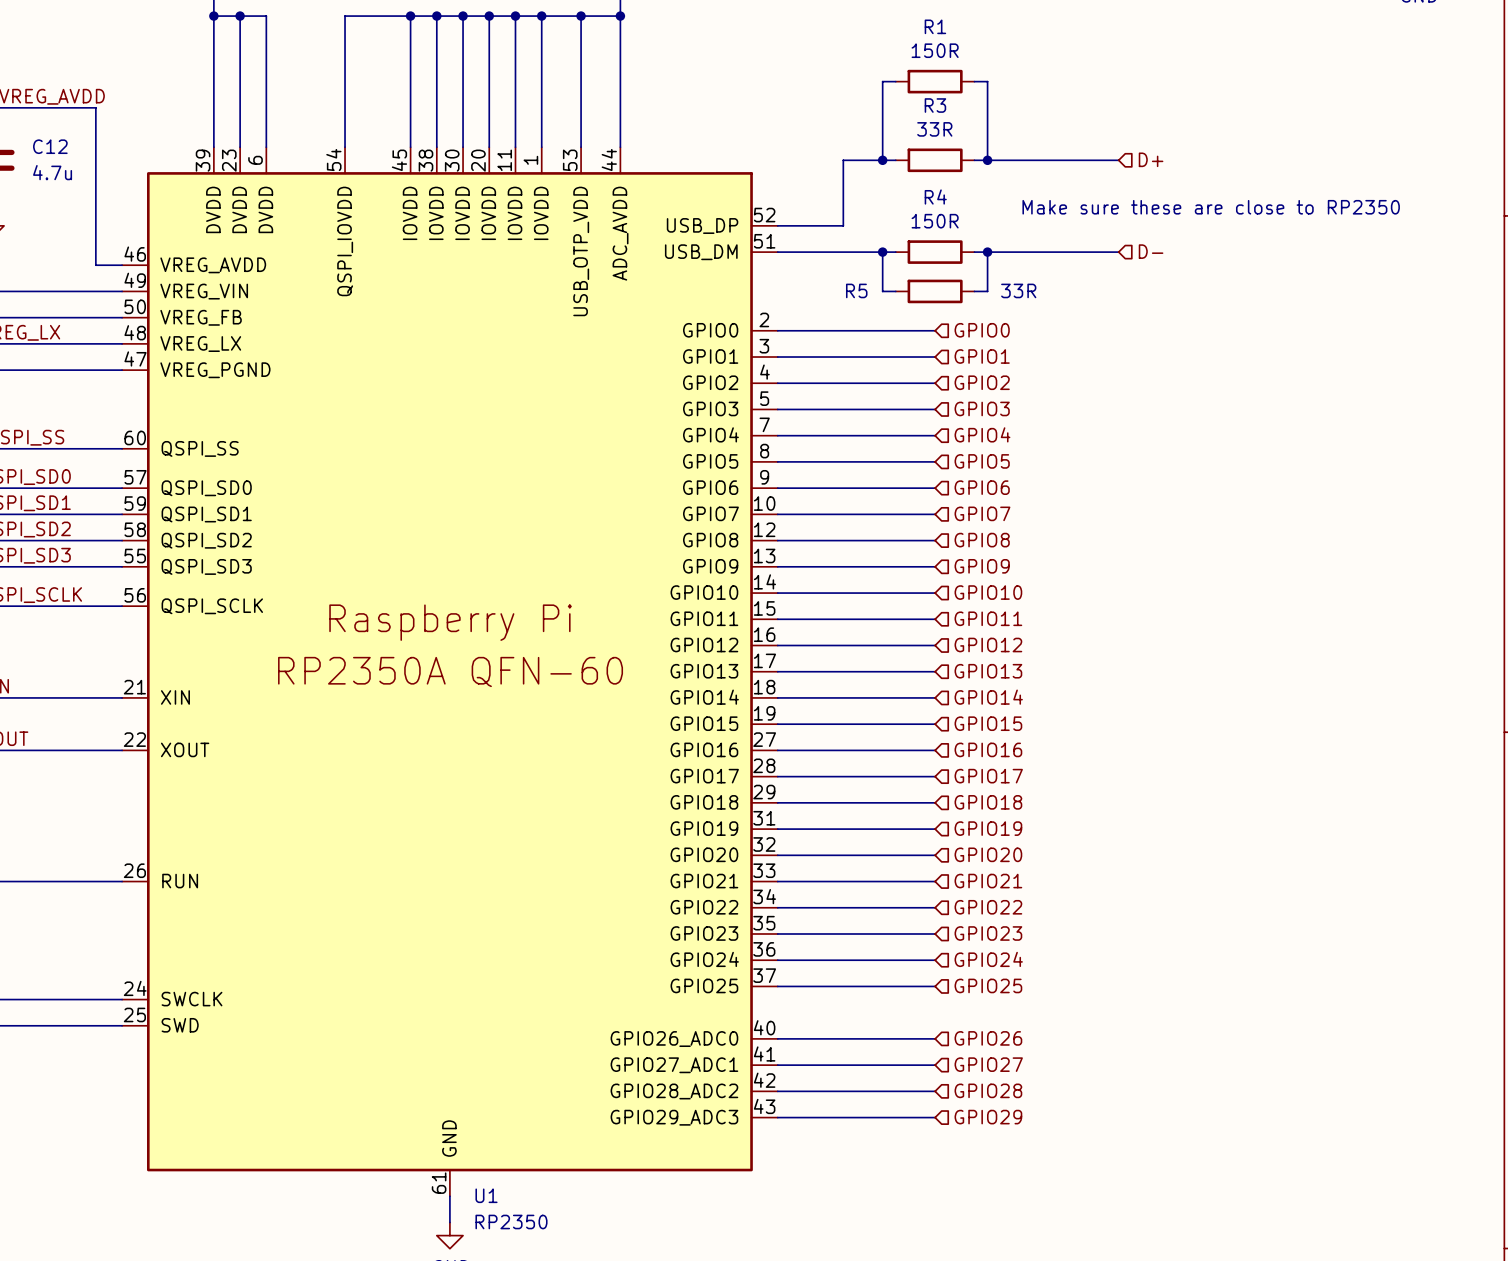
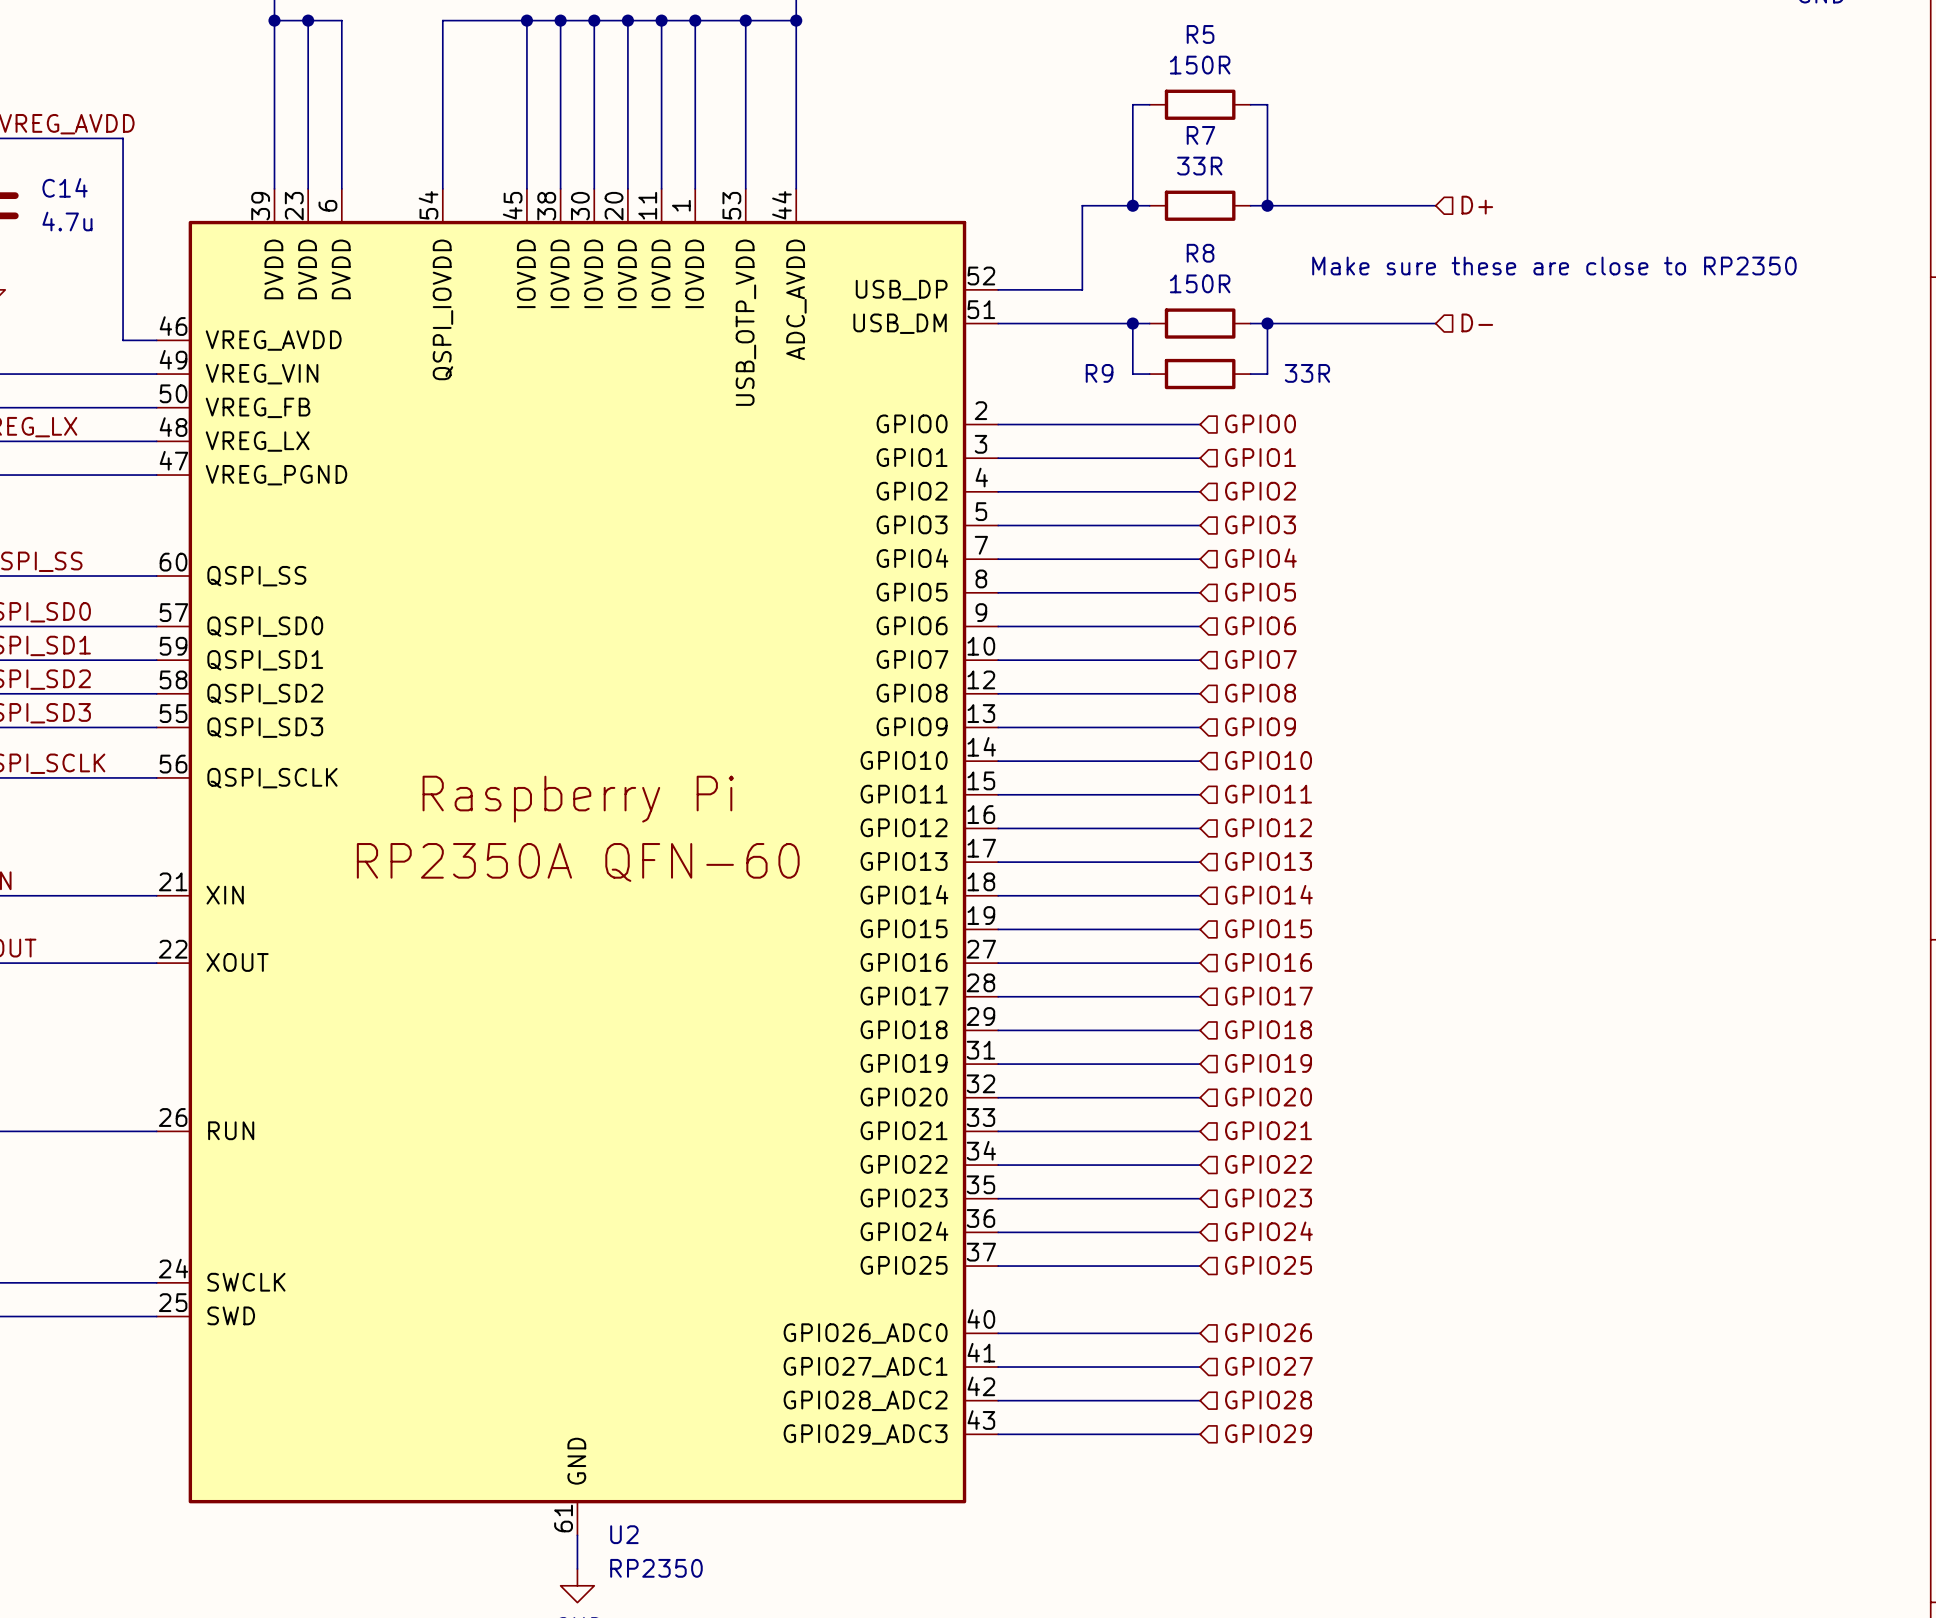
R1 name: R1 (935, 26) -> R5 (1200, 34)
R3 name: R3 (935, 105) -> R7 (1200, 135)
C12 name: C12 (50, 146) -> C14 (65, 187)
R4 name: R4 (935, 197) -> R8 (1200, 253)
R5 name: R5 (856, 290) -> R9 (1099, 373)
U1 name: U1 (486, 1195) -> U2 (624, 1534)

